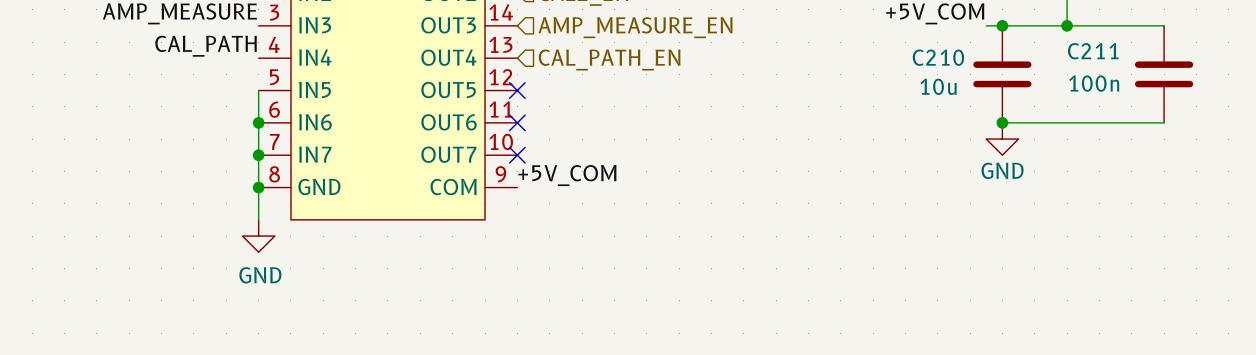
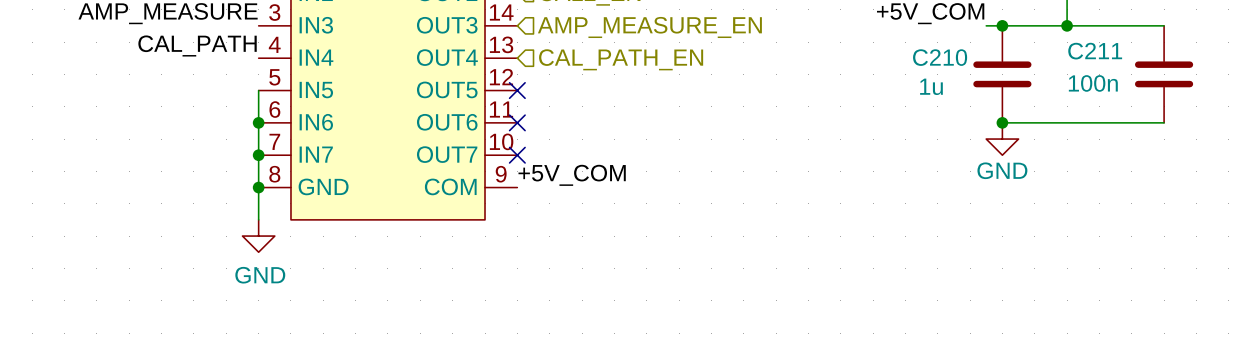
C210 value: 10u (938, 86) -> 1u (931, 86)

